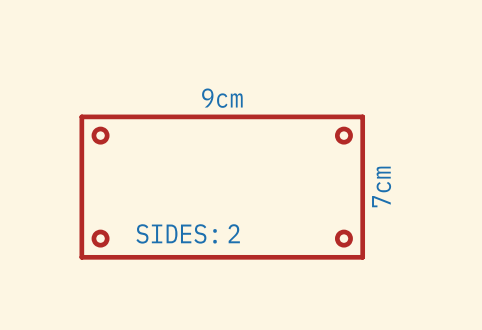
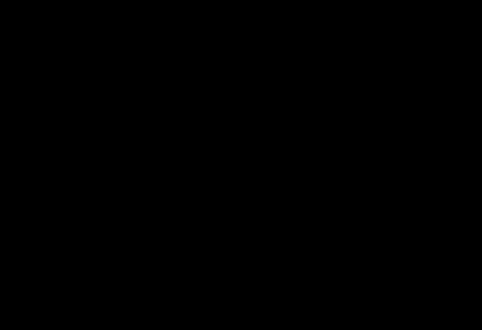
part: (222, 187) -> none

